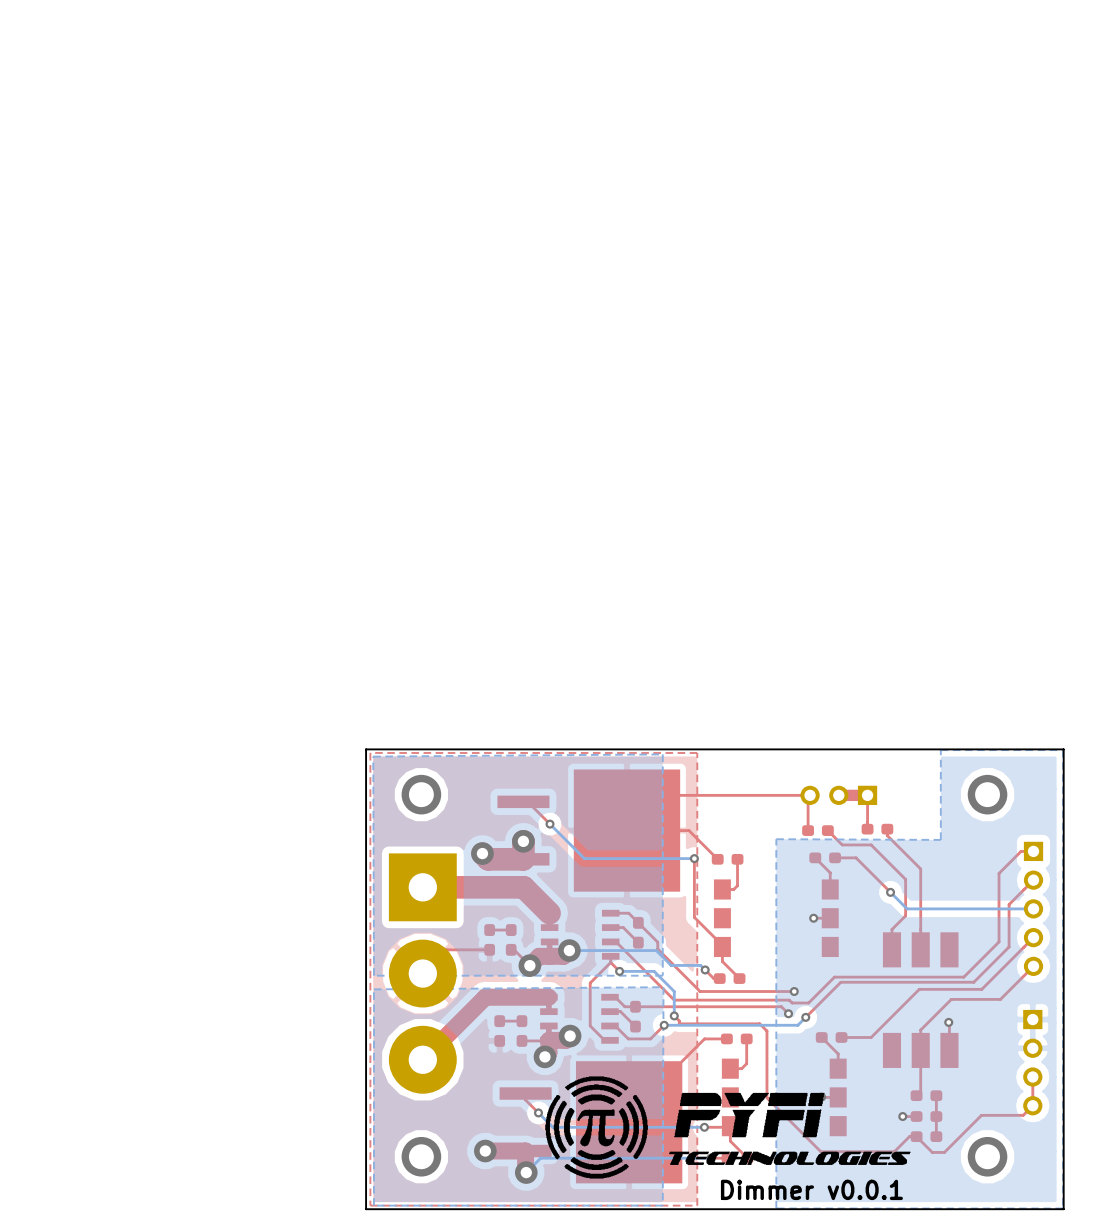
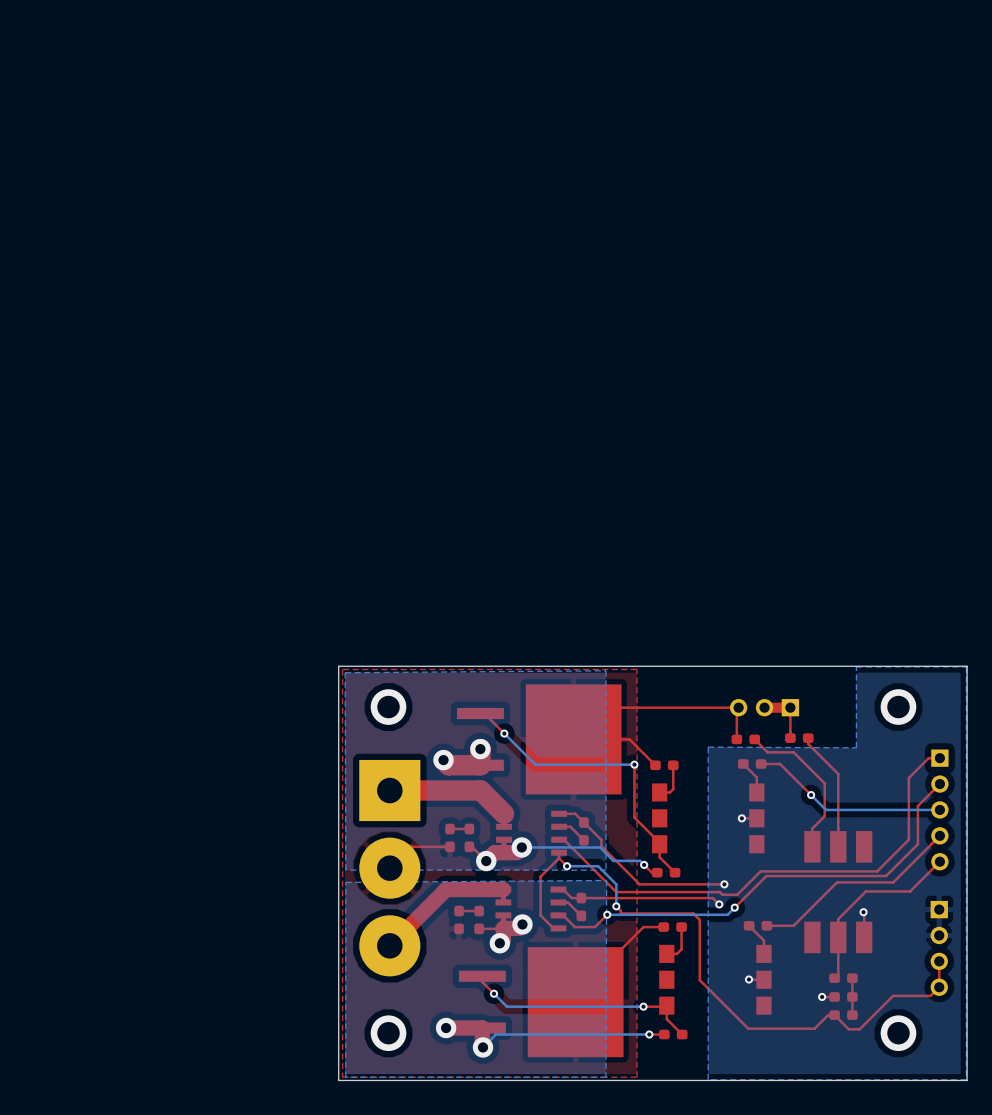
drawing: [545, 1076, 911, 1179] -> none
text: Dimmer v0.0.1 (811, 1189) -> none

